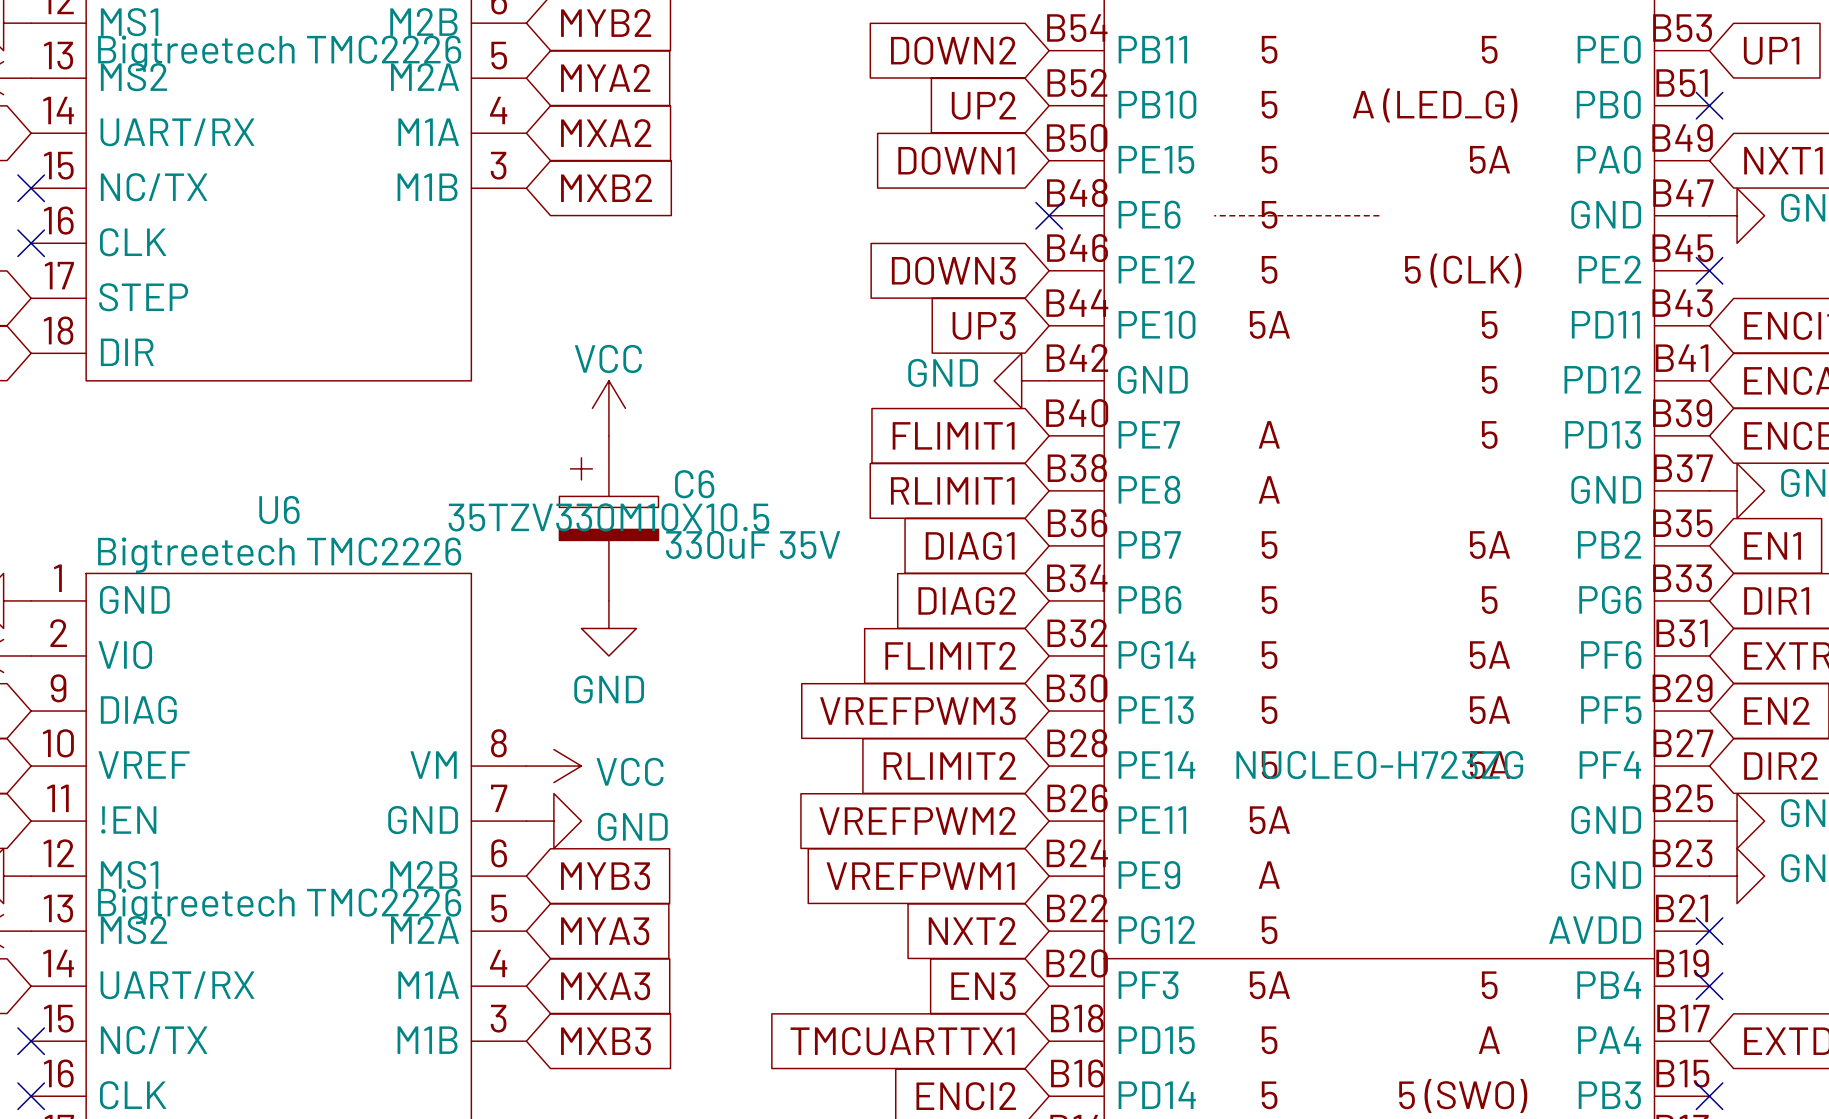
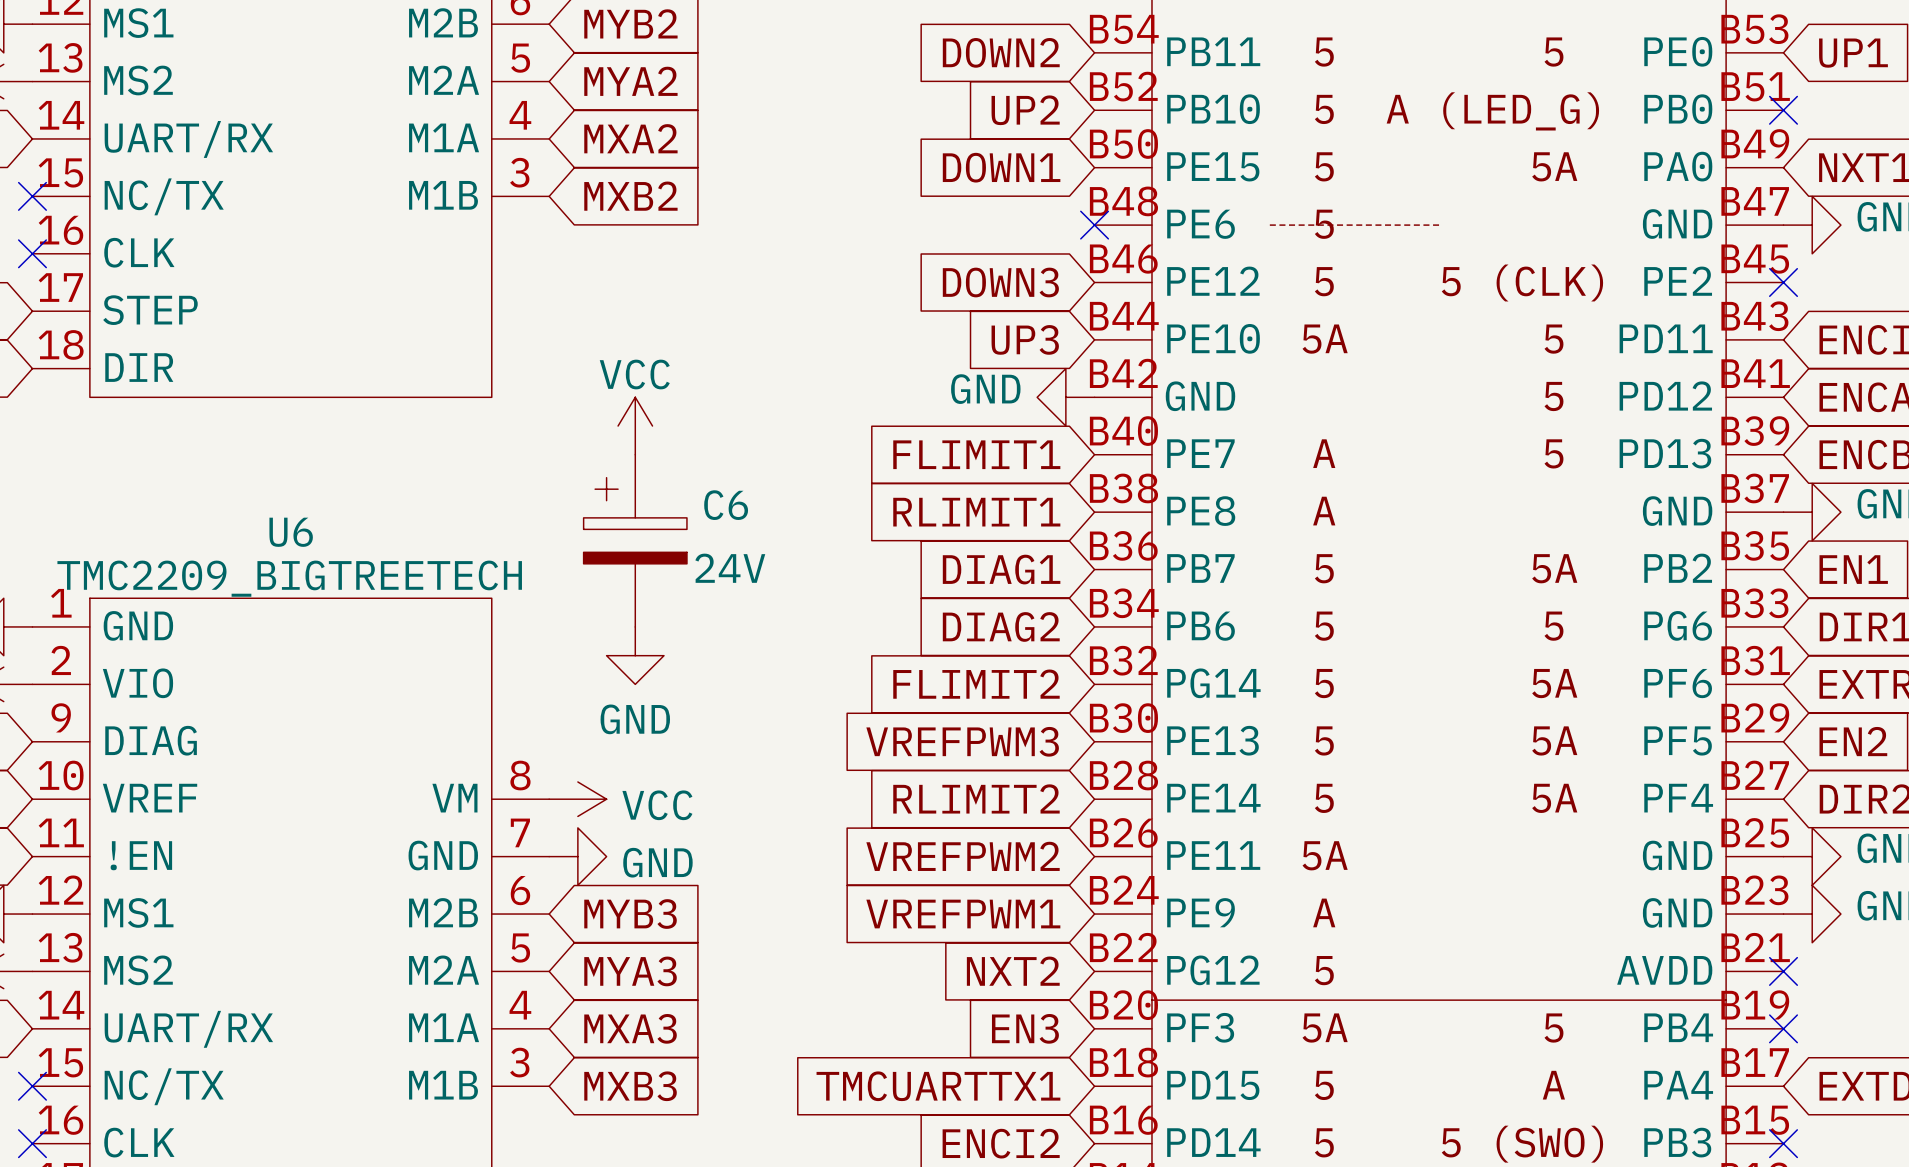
part text: Bigtreetech TMC2226 (279, 53) -> none
C6 text: 35TZV330M10X10.5 (608, 517) -> none
C6 value: 330uF 35V (753, 544) -> 24V (730, 568)
U6 value: Bigtreetech TMC2226 (279, 555) -> TMC2209_BIGTREETECH (289, 578)
part text: NUCLEO-H723ZG (1379, 765) -> none
U6 text: Bigtreetech TMC2226 (279, 906) -> none

